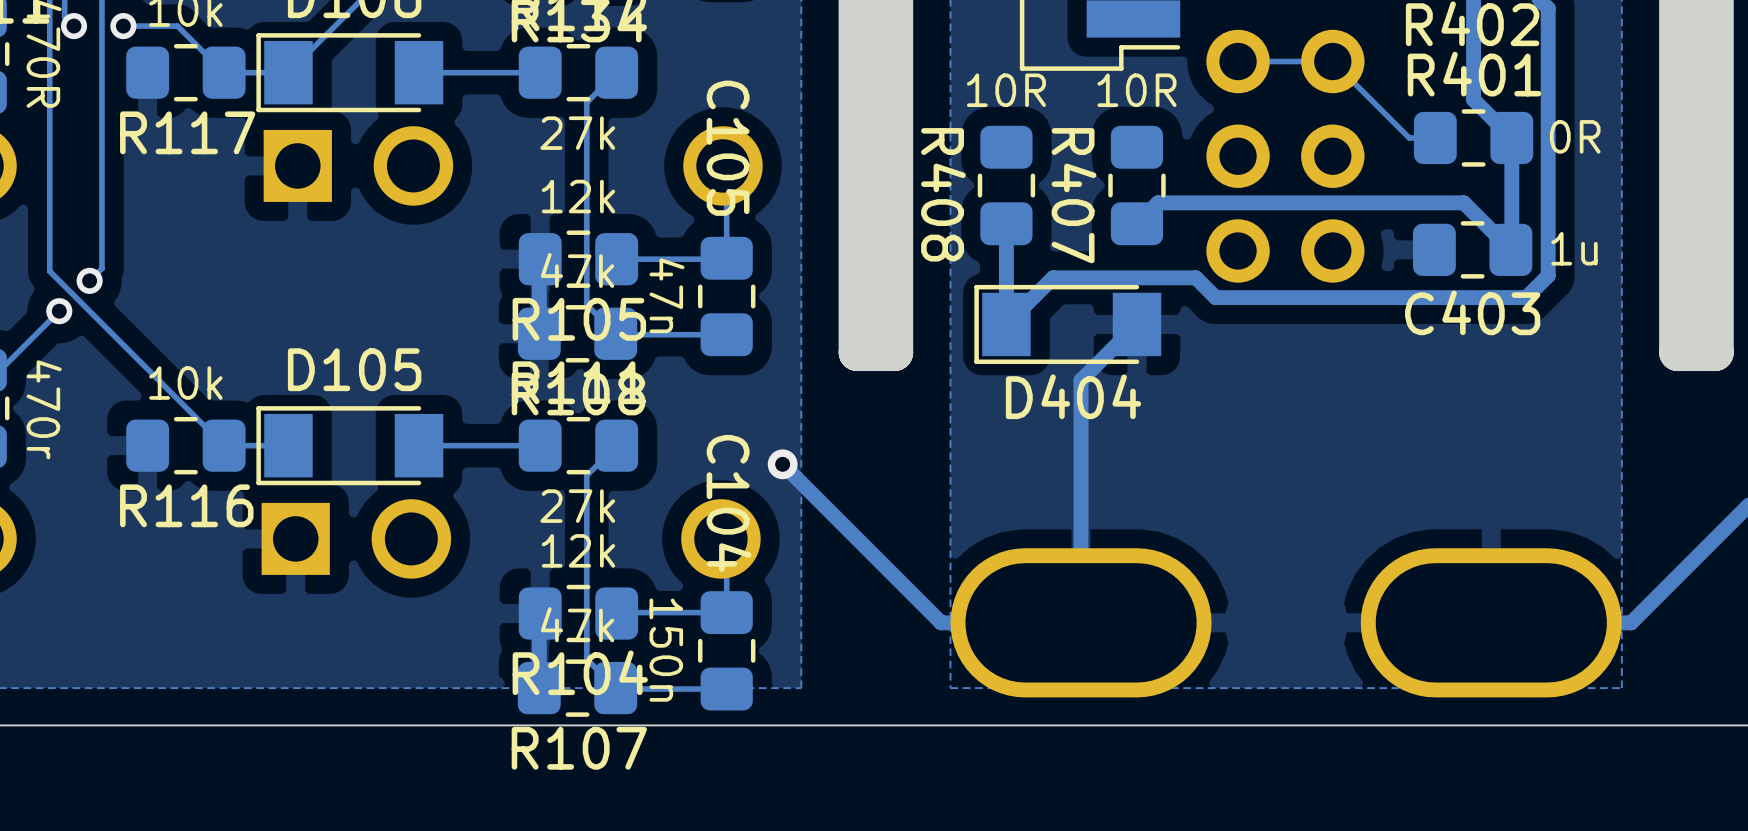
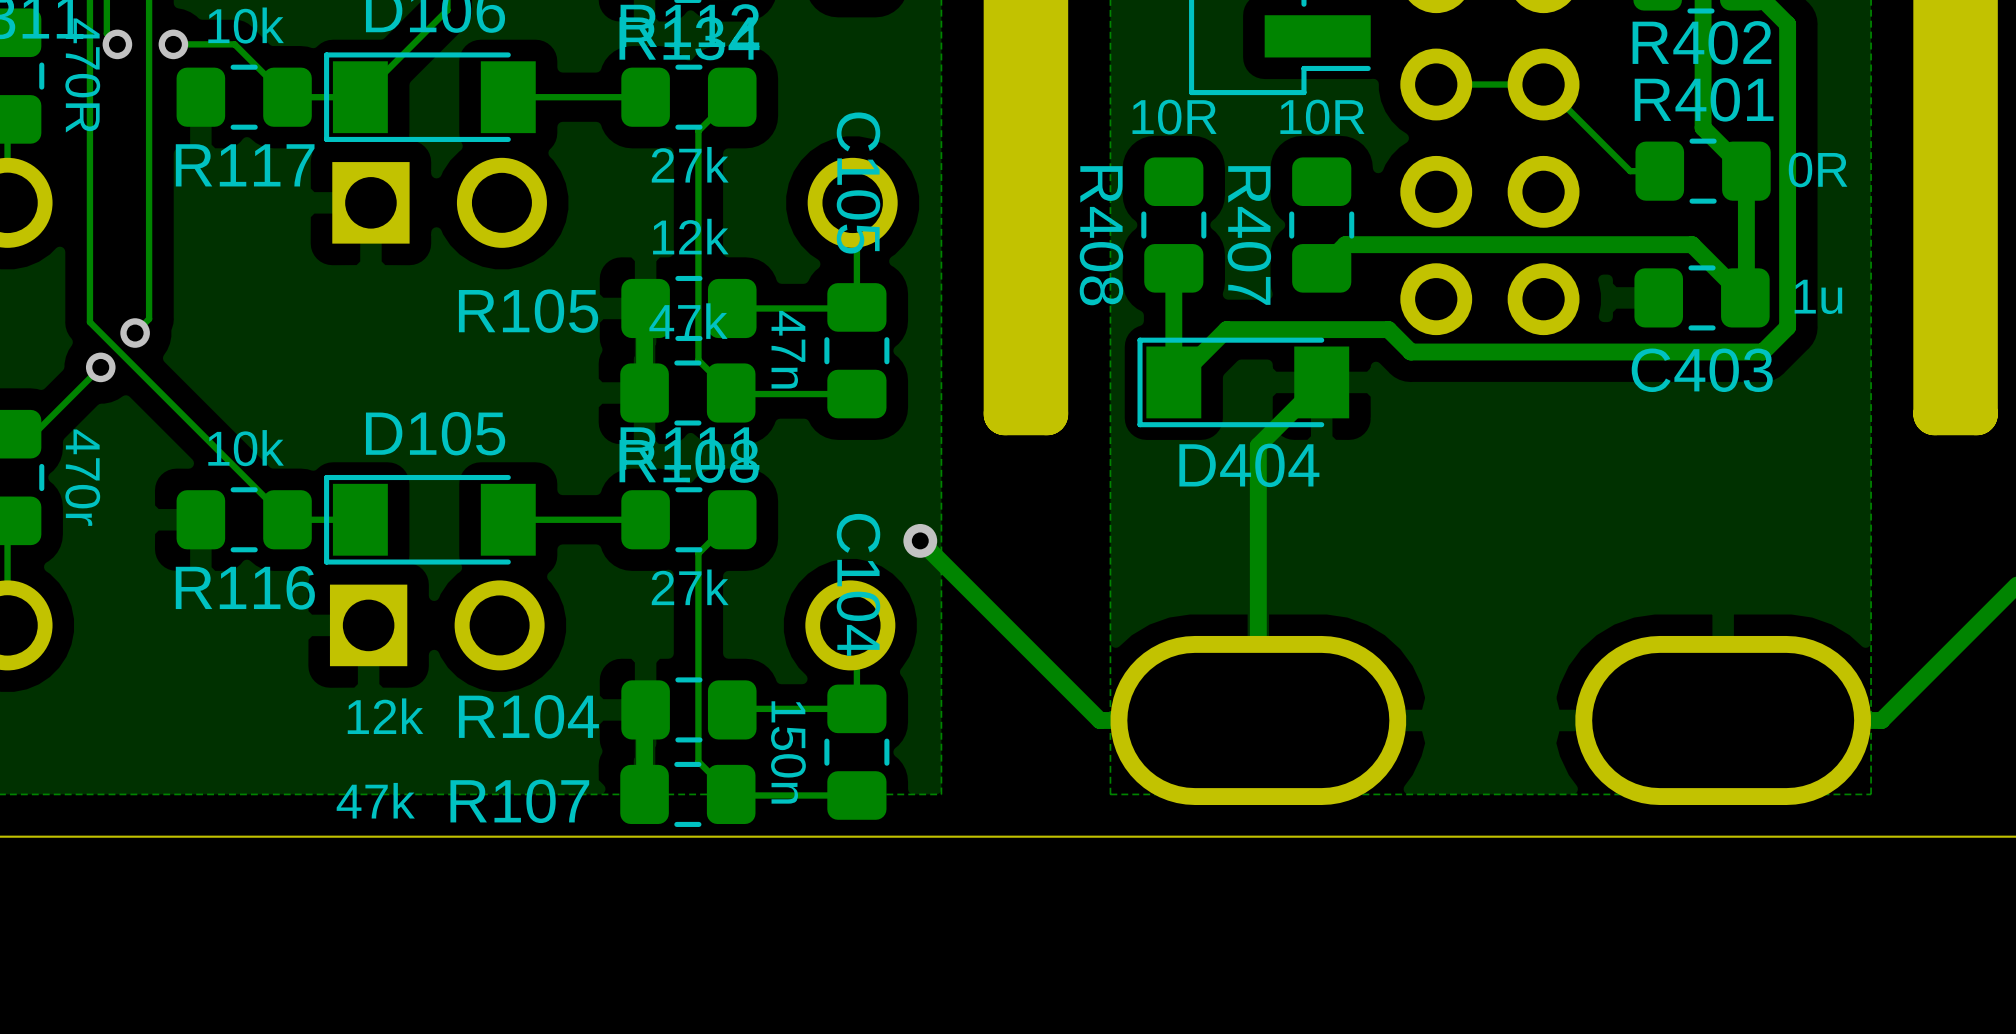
R105 name position: R105 (579, 319) -> R105 (528, 311)
R104 value position: 12k (578, 550) -> 12k (385, 716)
R107 value position: 47k (577, 624) -> 47k (375, 800)
R104 name position: R104 (580, 672) -> R104 (528, 716)
R107 name position: R107 (579, 748) -> R107 (519, 801)

